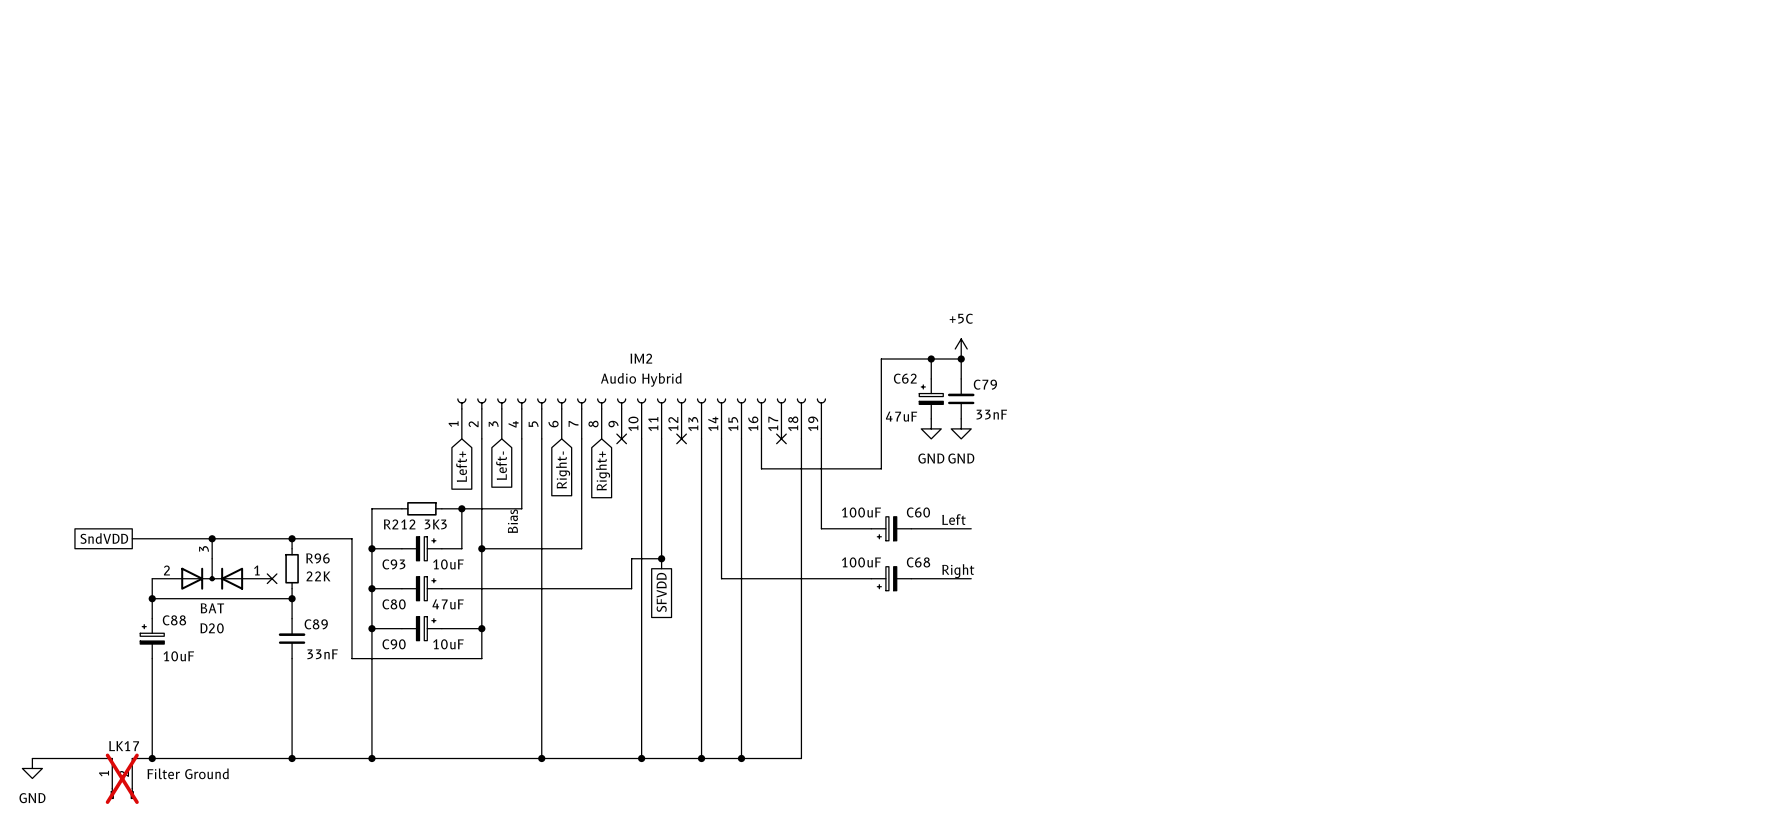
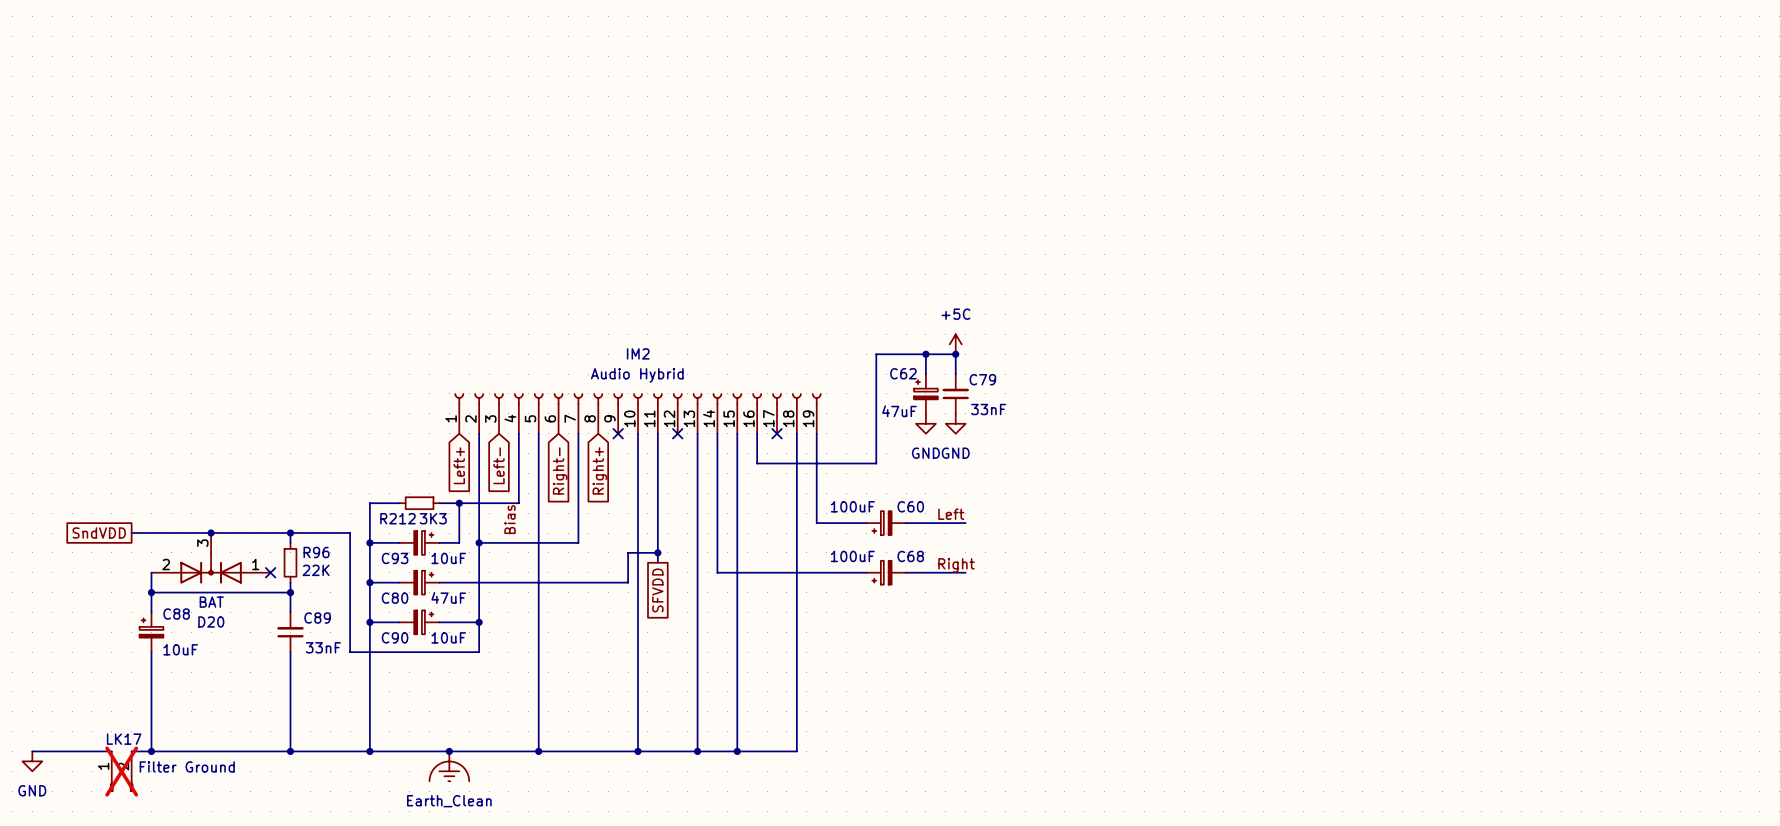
junction: none -> (449, 751)
power symbol: none -> Earth_Clean (449, 766)

